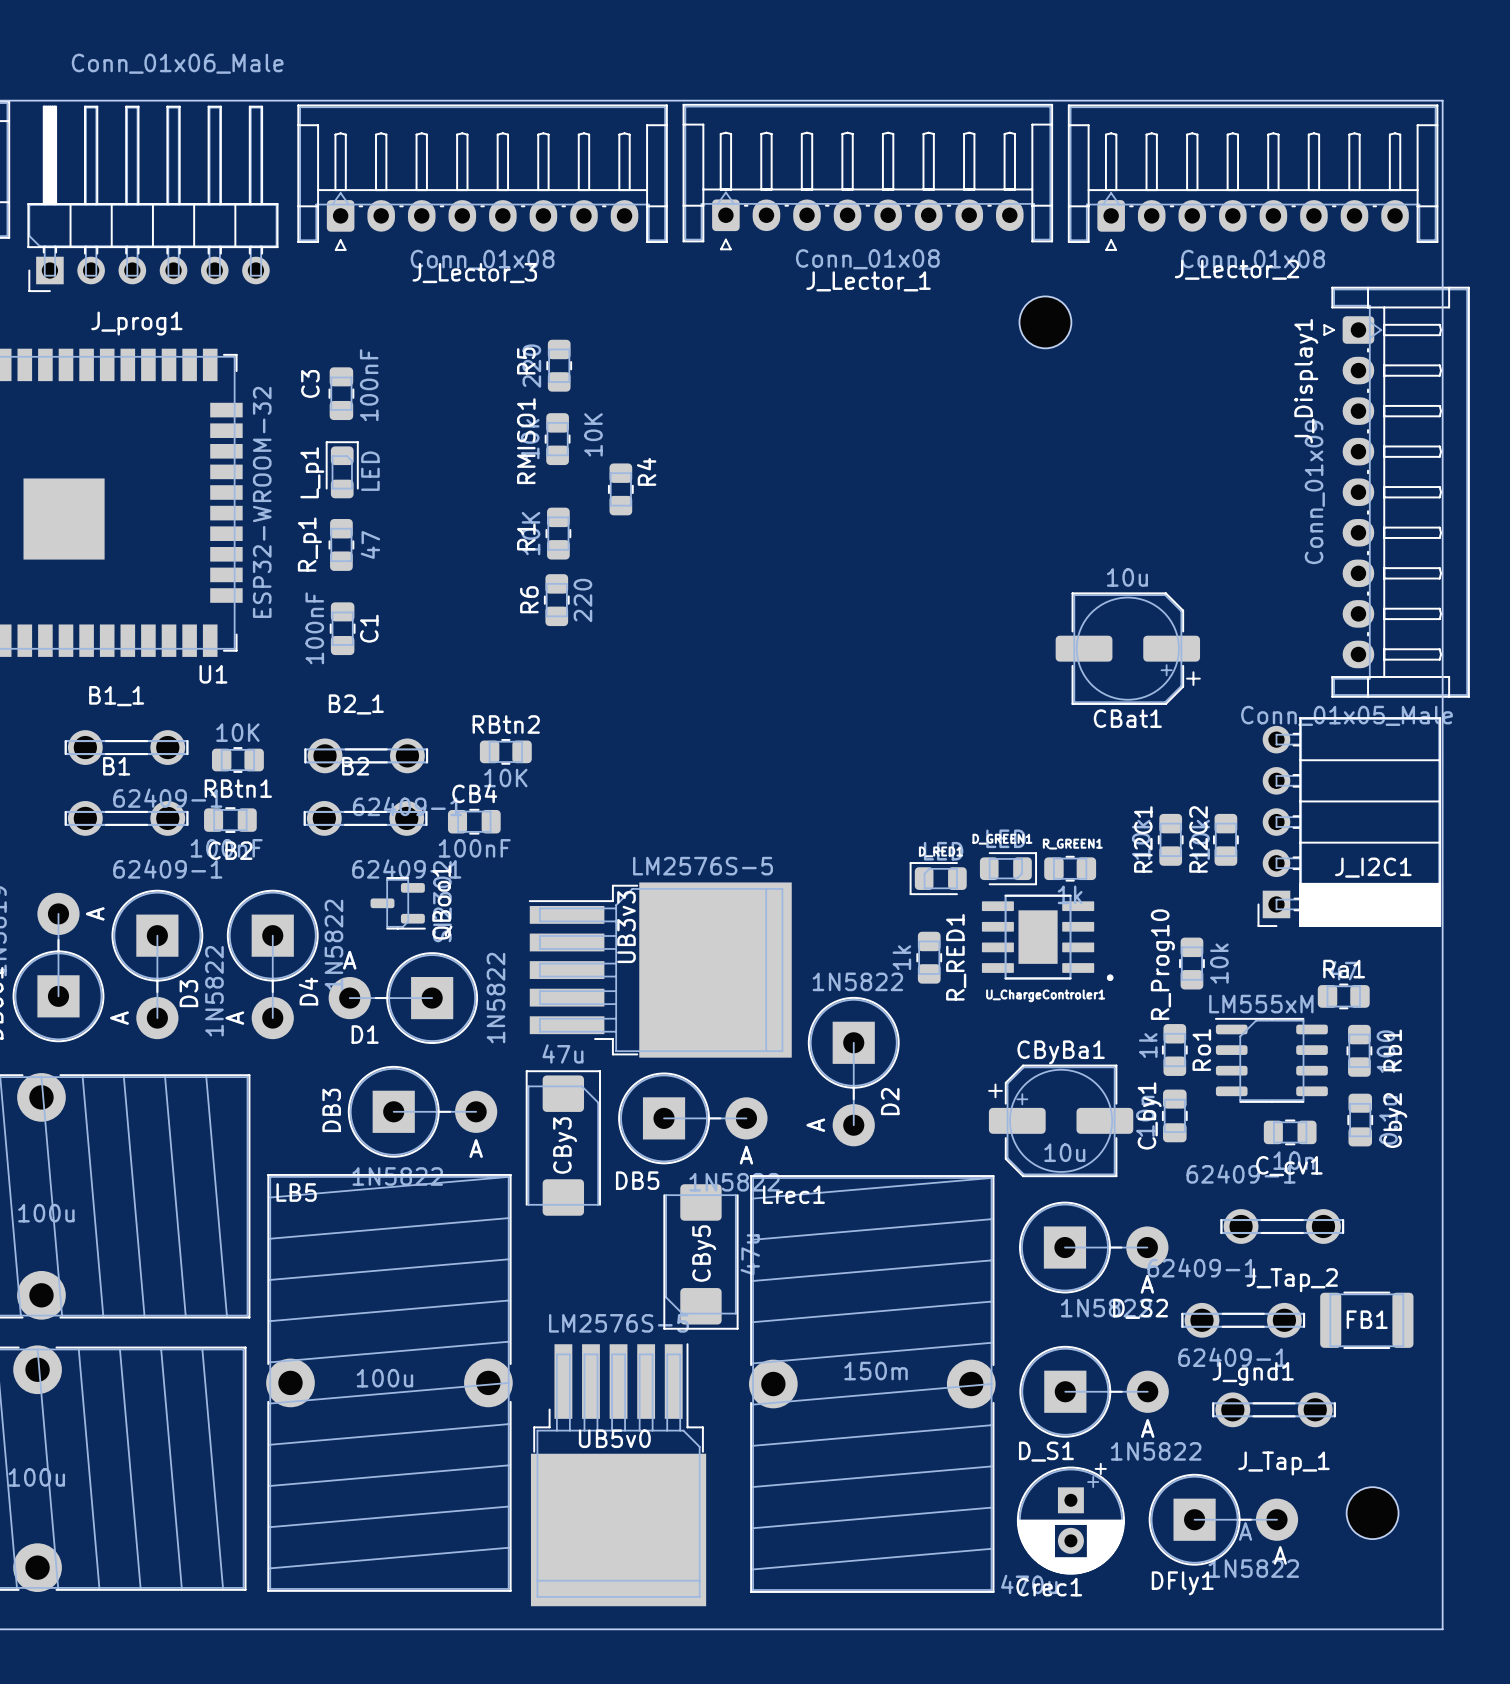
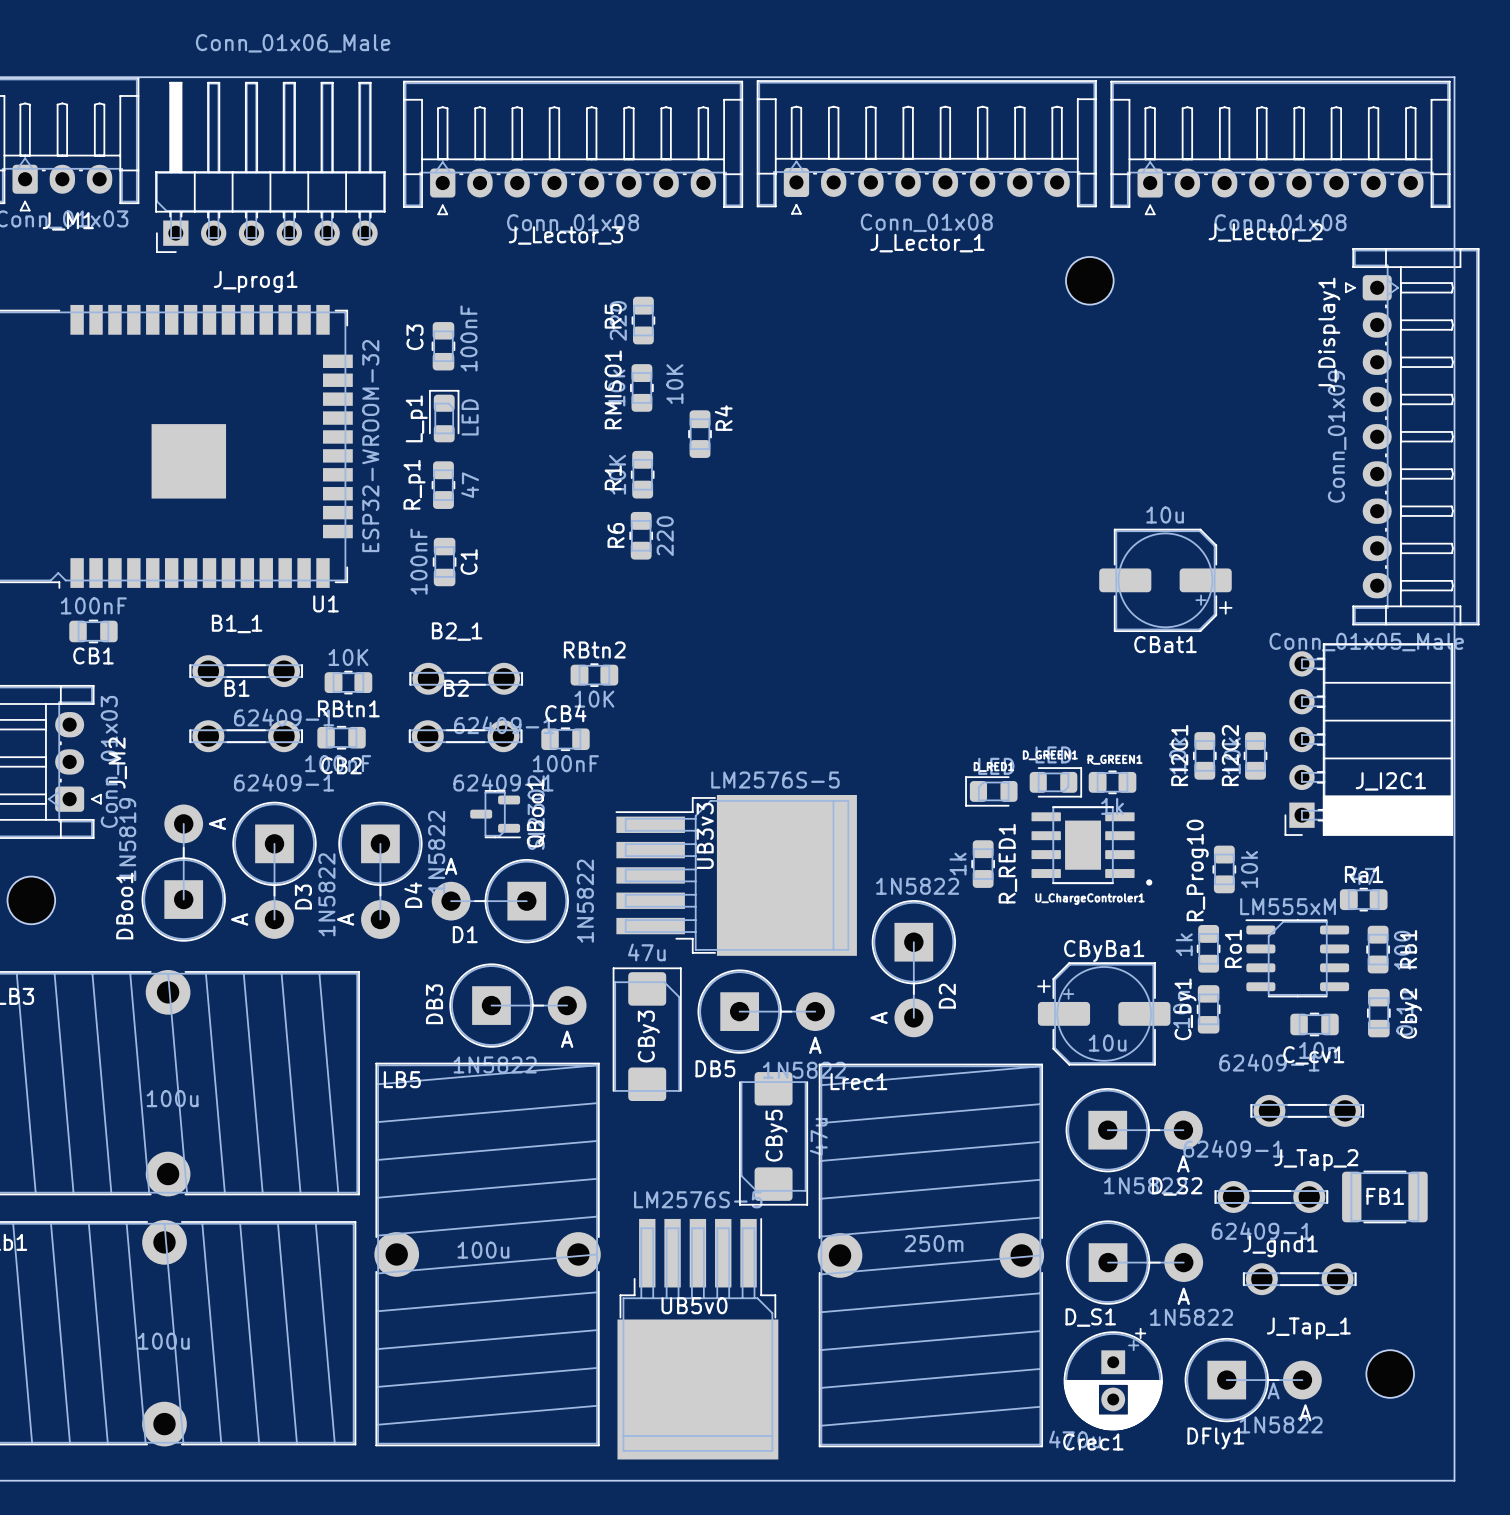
Lrec1 value: 150m (876, 1371) -> 250m (933, 1243)

